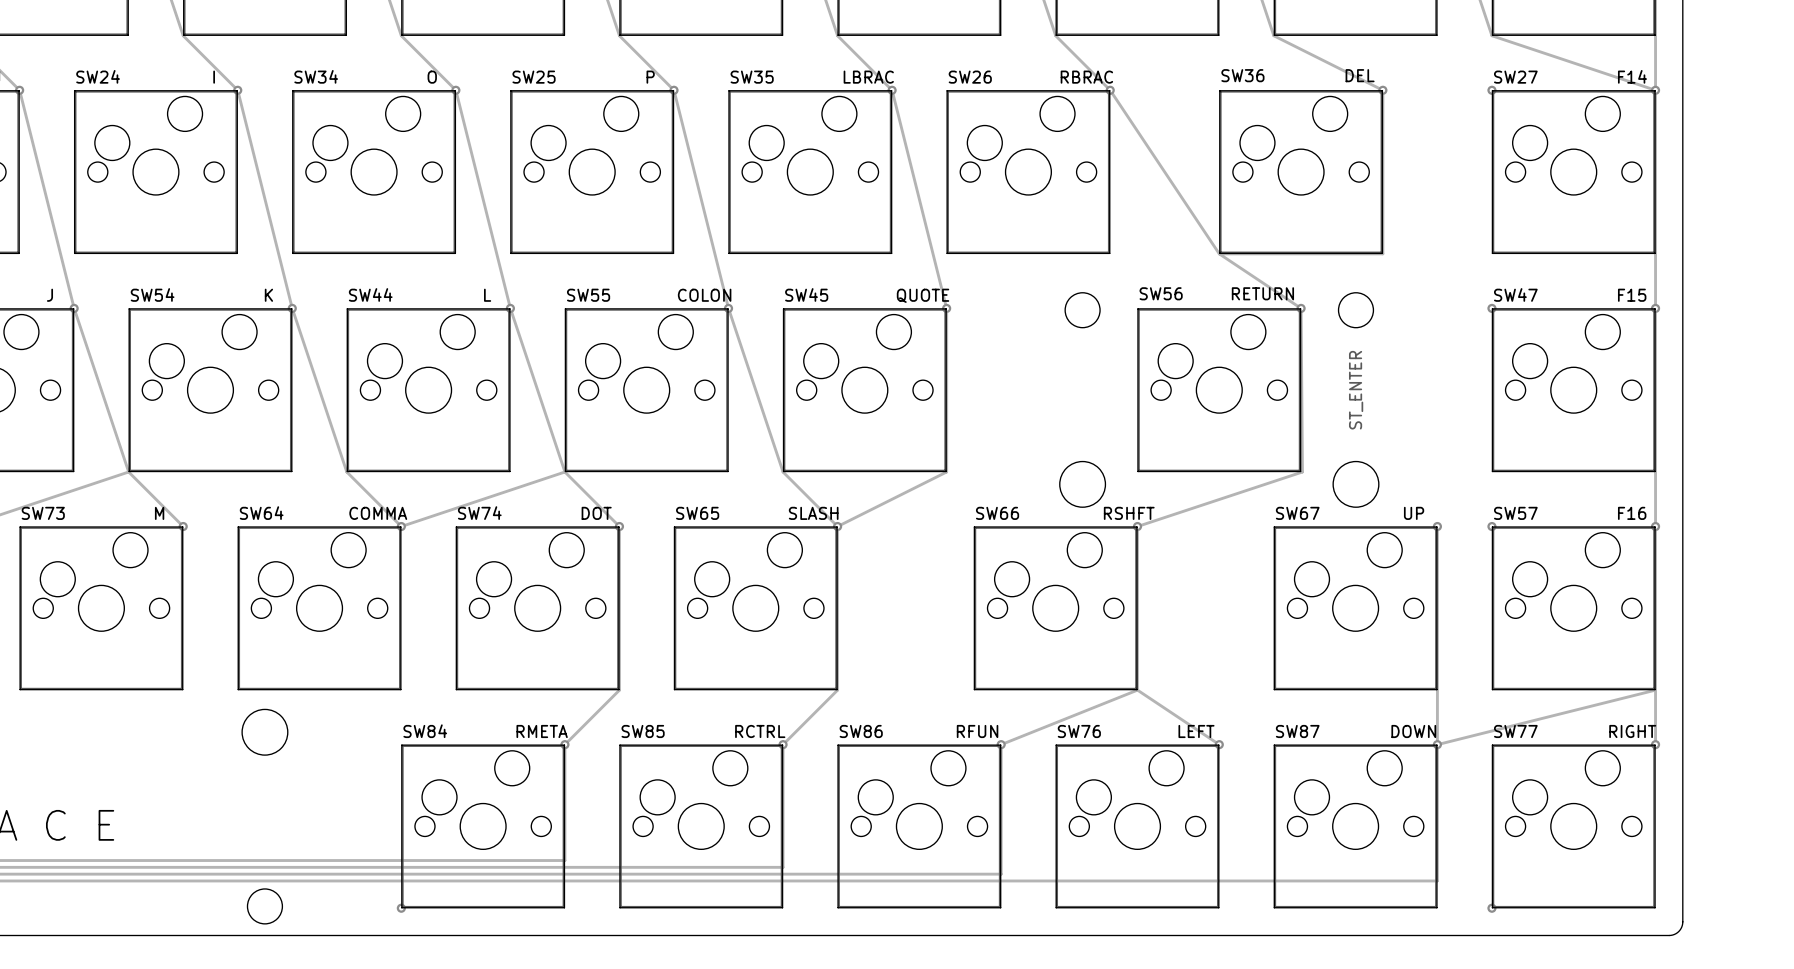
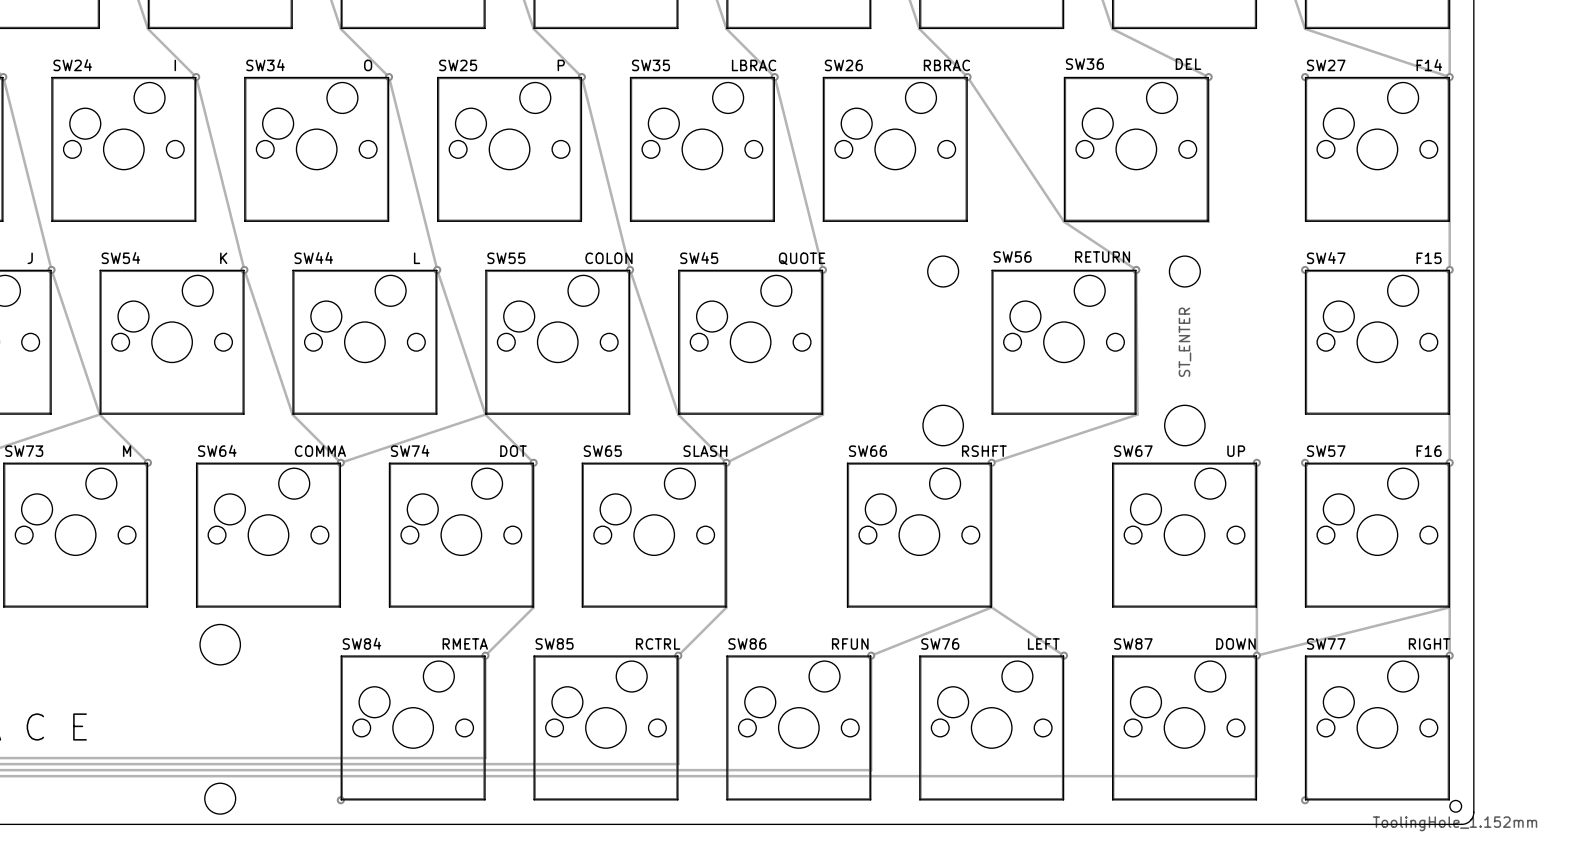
part: none -> ToolingHole_1.152mm (1455, 806)

